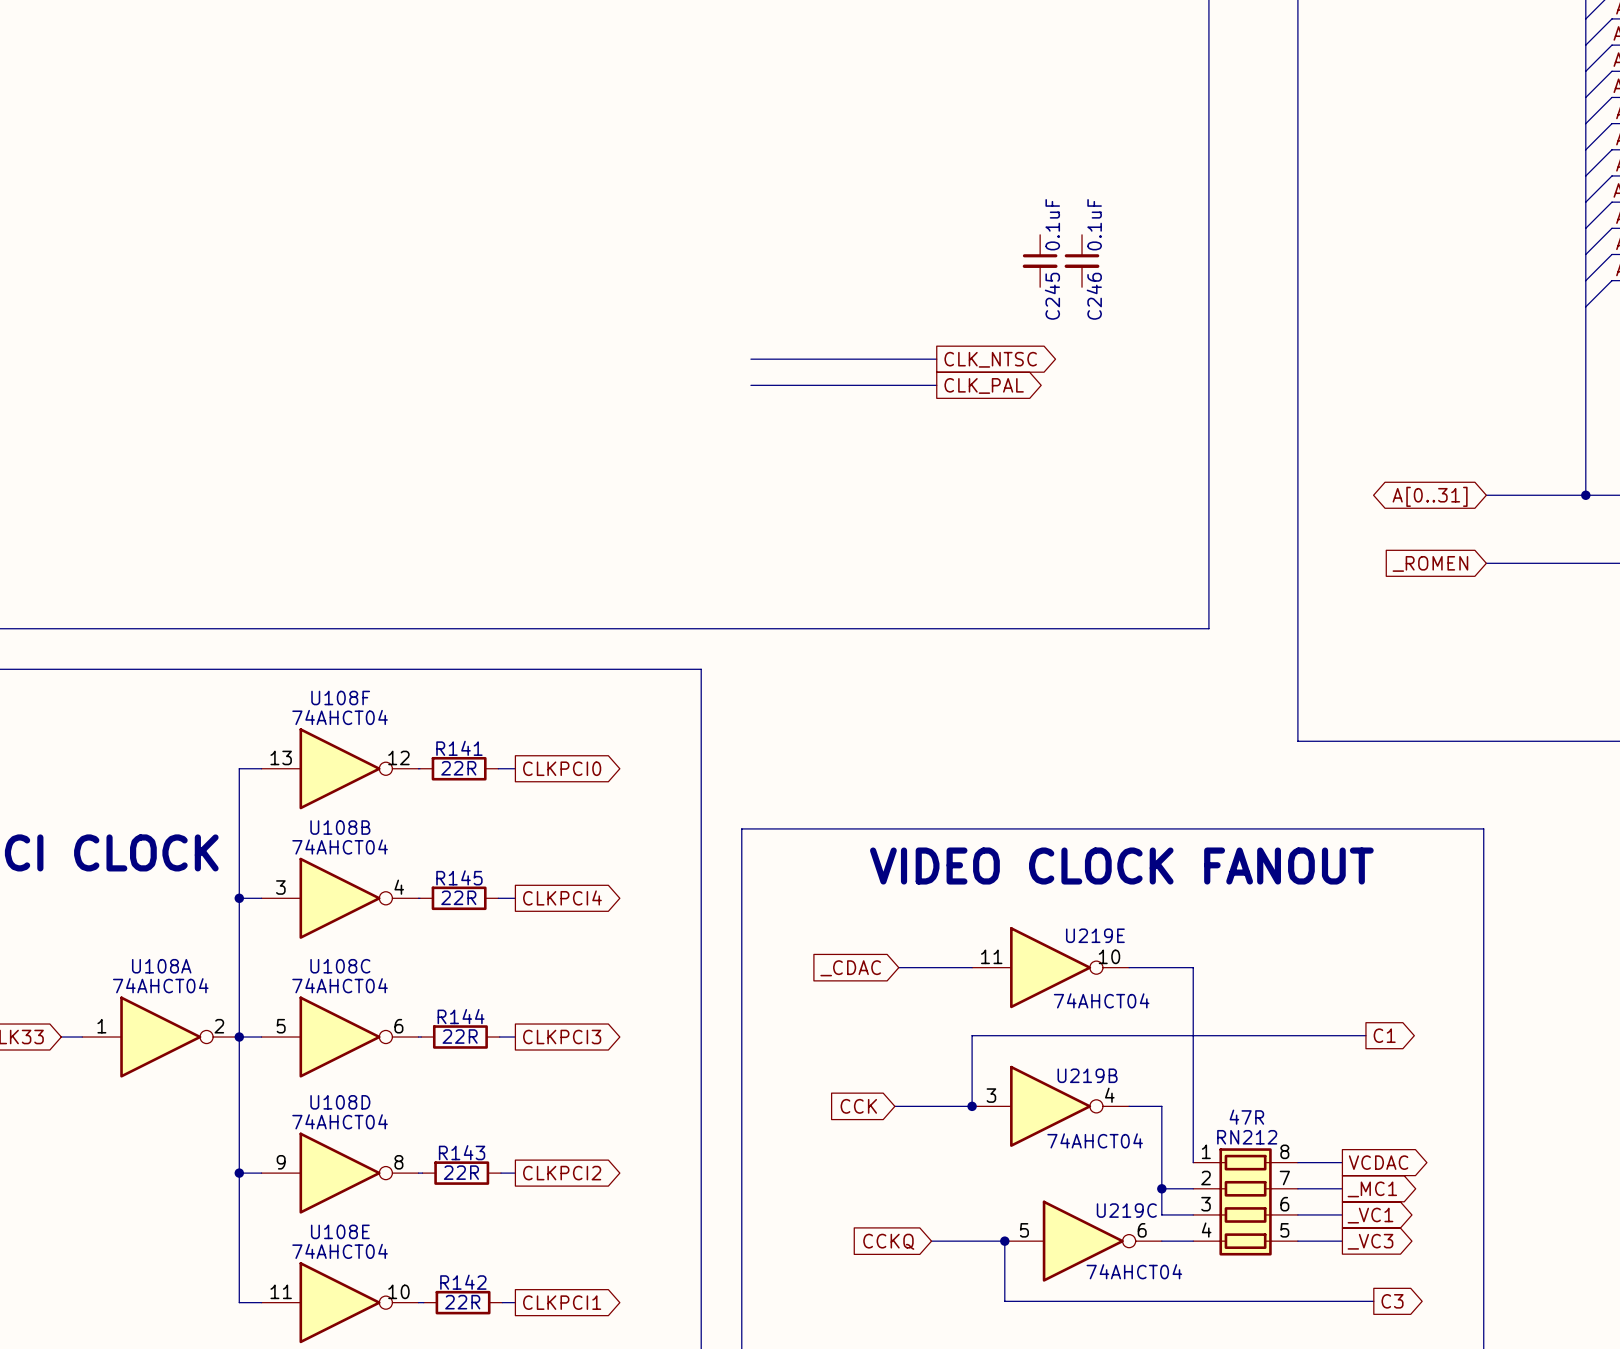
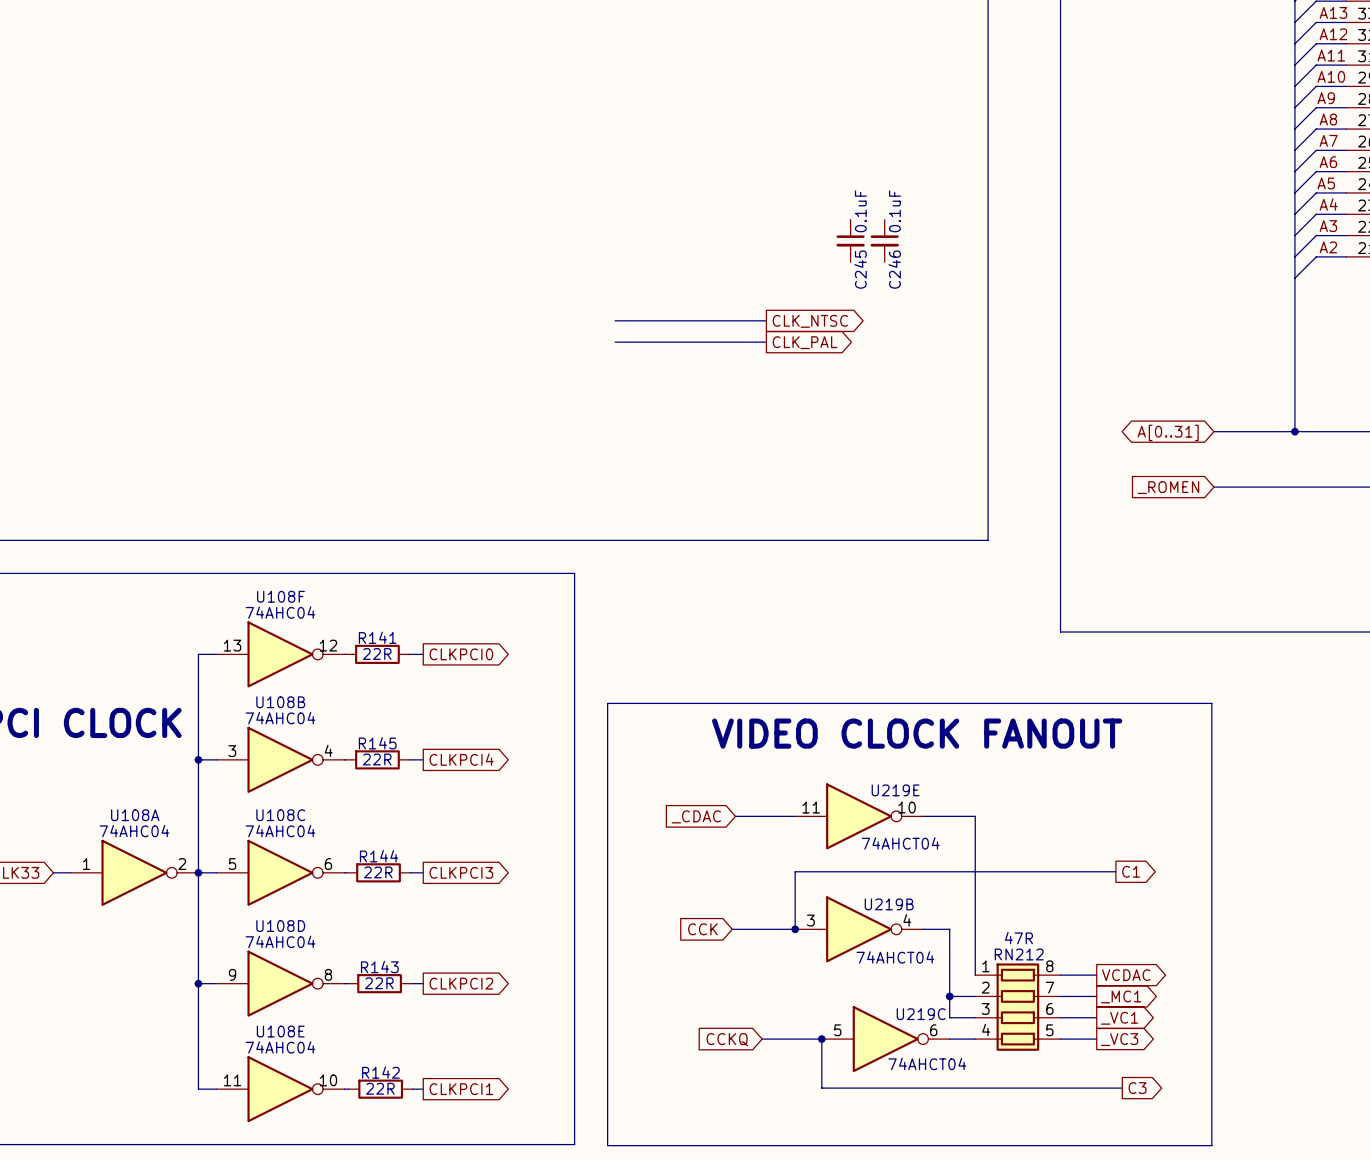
U108F value: 74AHCT04 (340, 717) -> 74AHC04 (280, 612)
U108B value: 74AHCT04 (340, 847) -> 74AHC04 (280, 718)
U108A value: 74AHCT04 (160, 985) -> 74AHC04 (134, 831)
U108C value: 74AHCT04 (340, 985) -> 74AHC04 (280, 831)
U108D value: 74AHCT04 (340, 1121) -> 74AHC04 (280, 941)
U108E value: 74AHCT04 (340, 1251) -> 74AHC04 (280, 1047)

